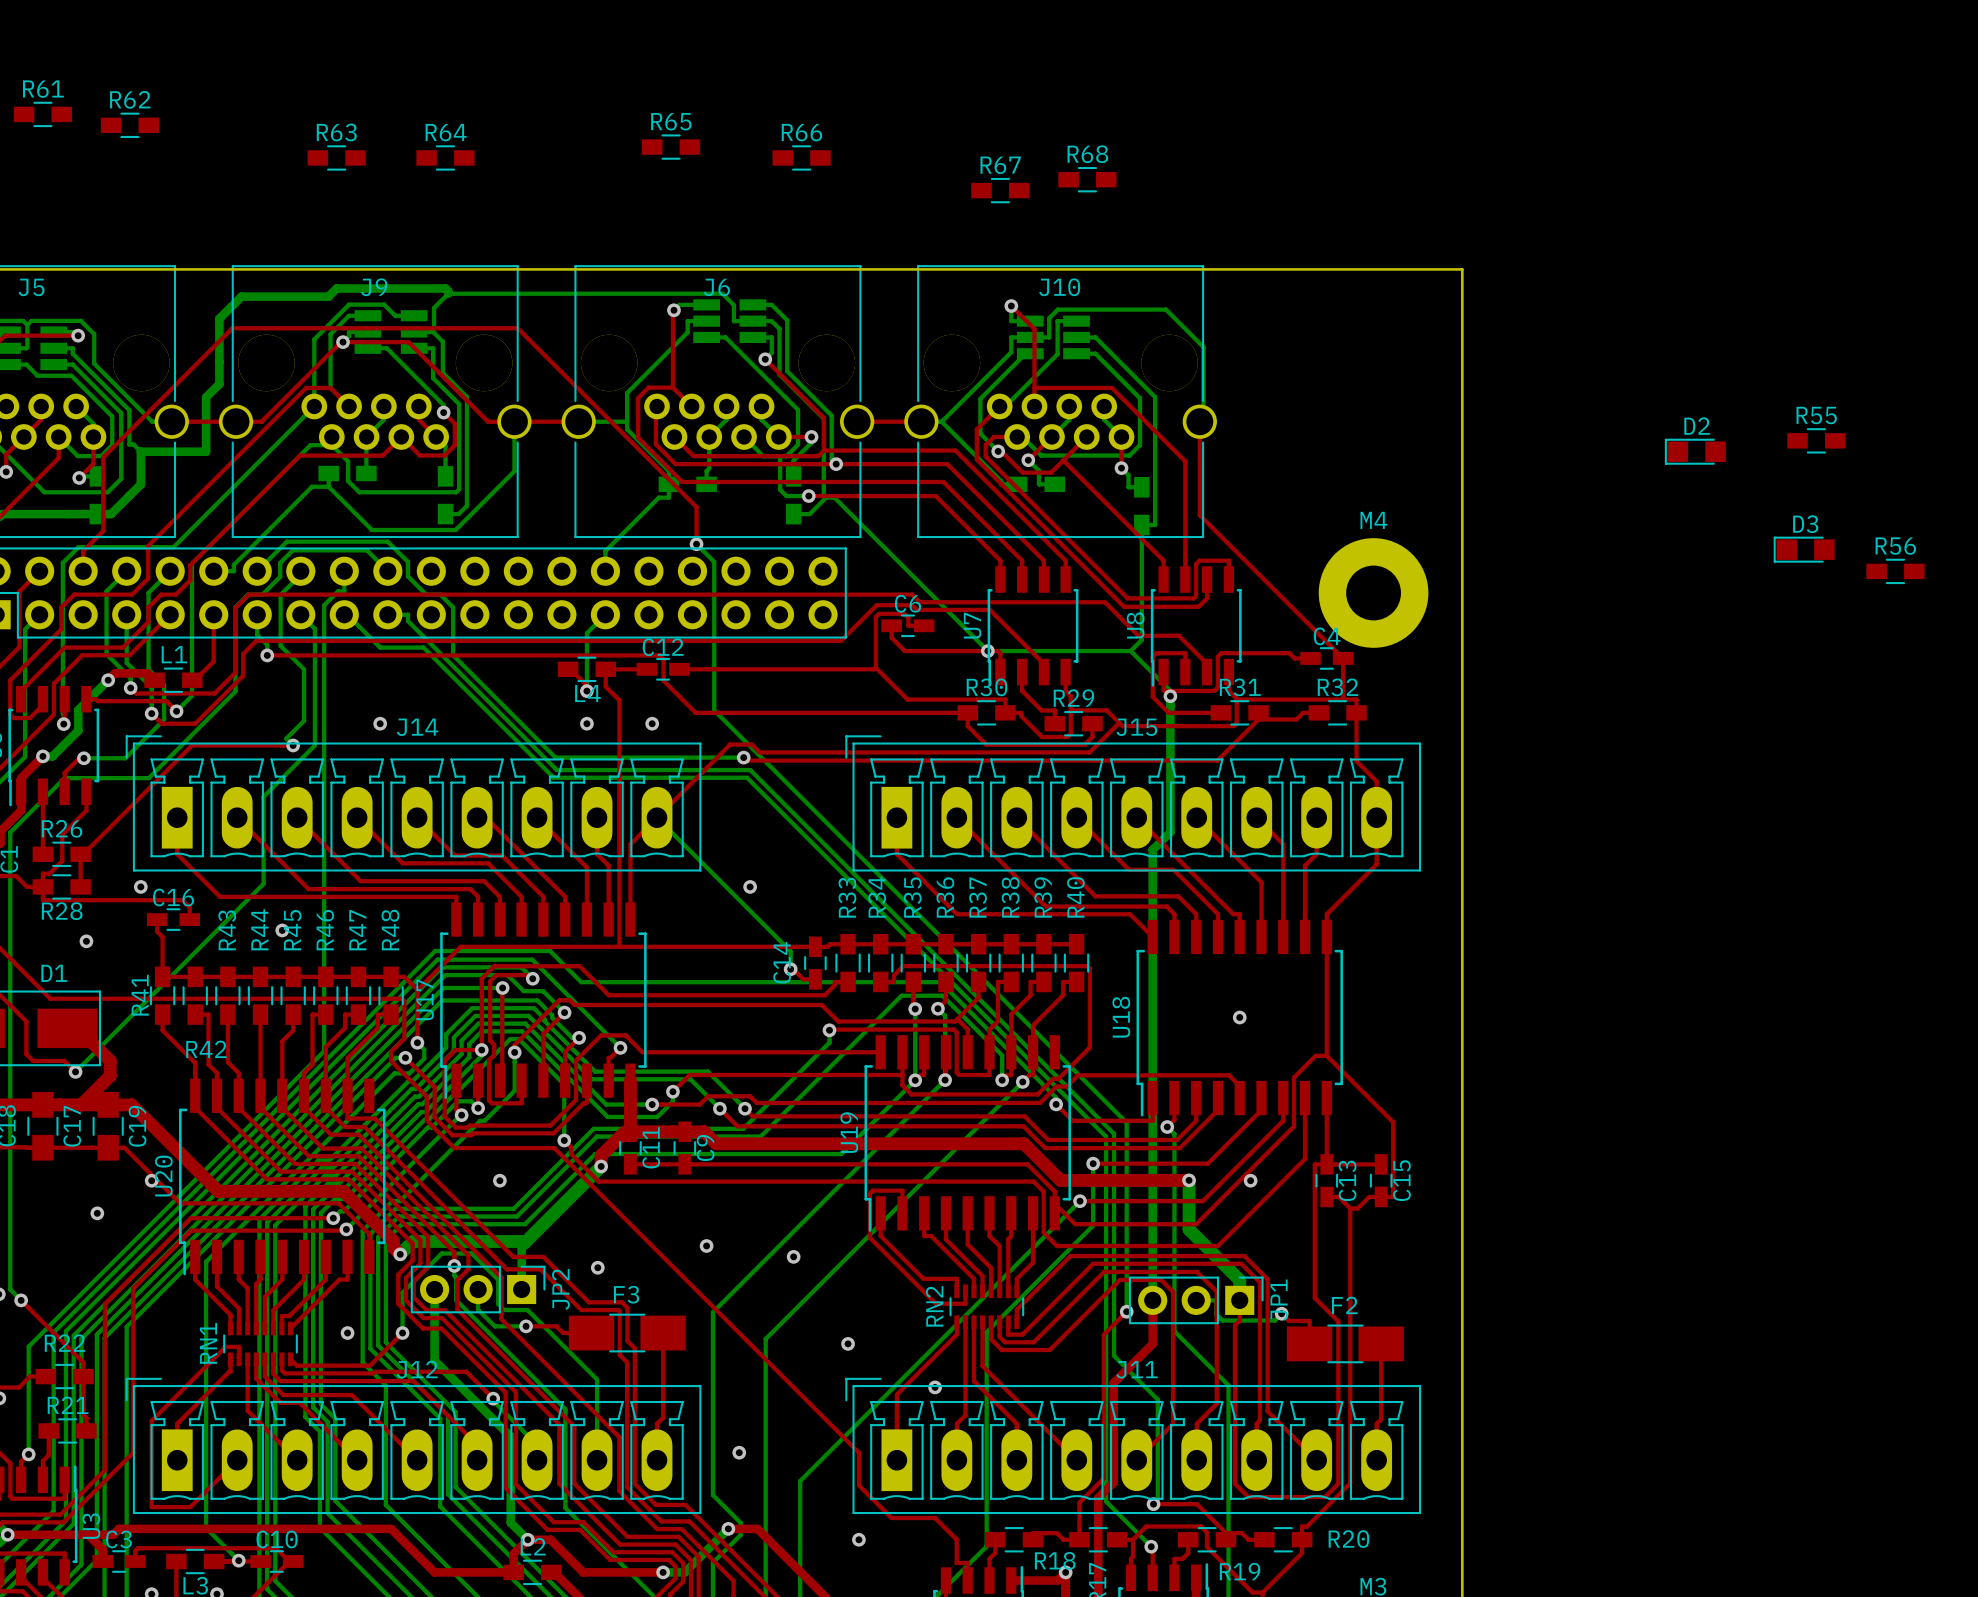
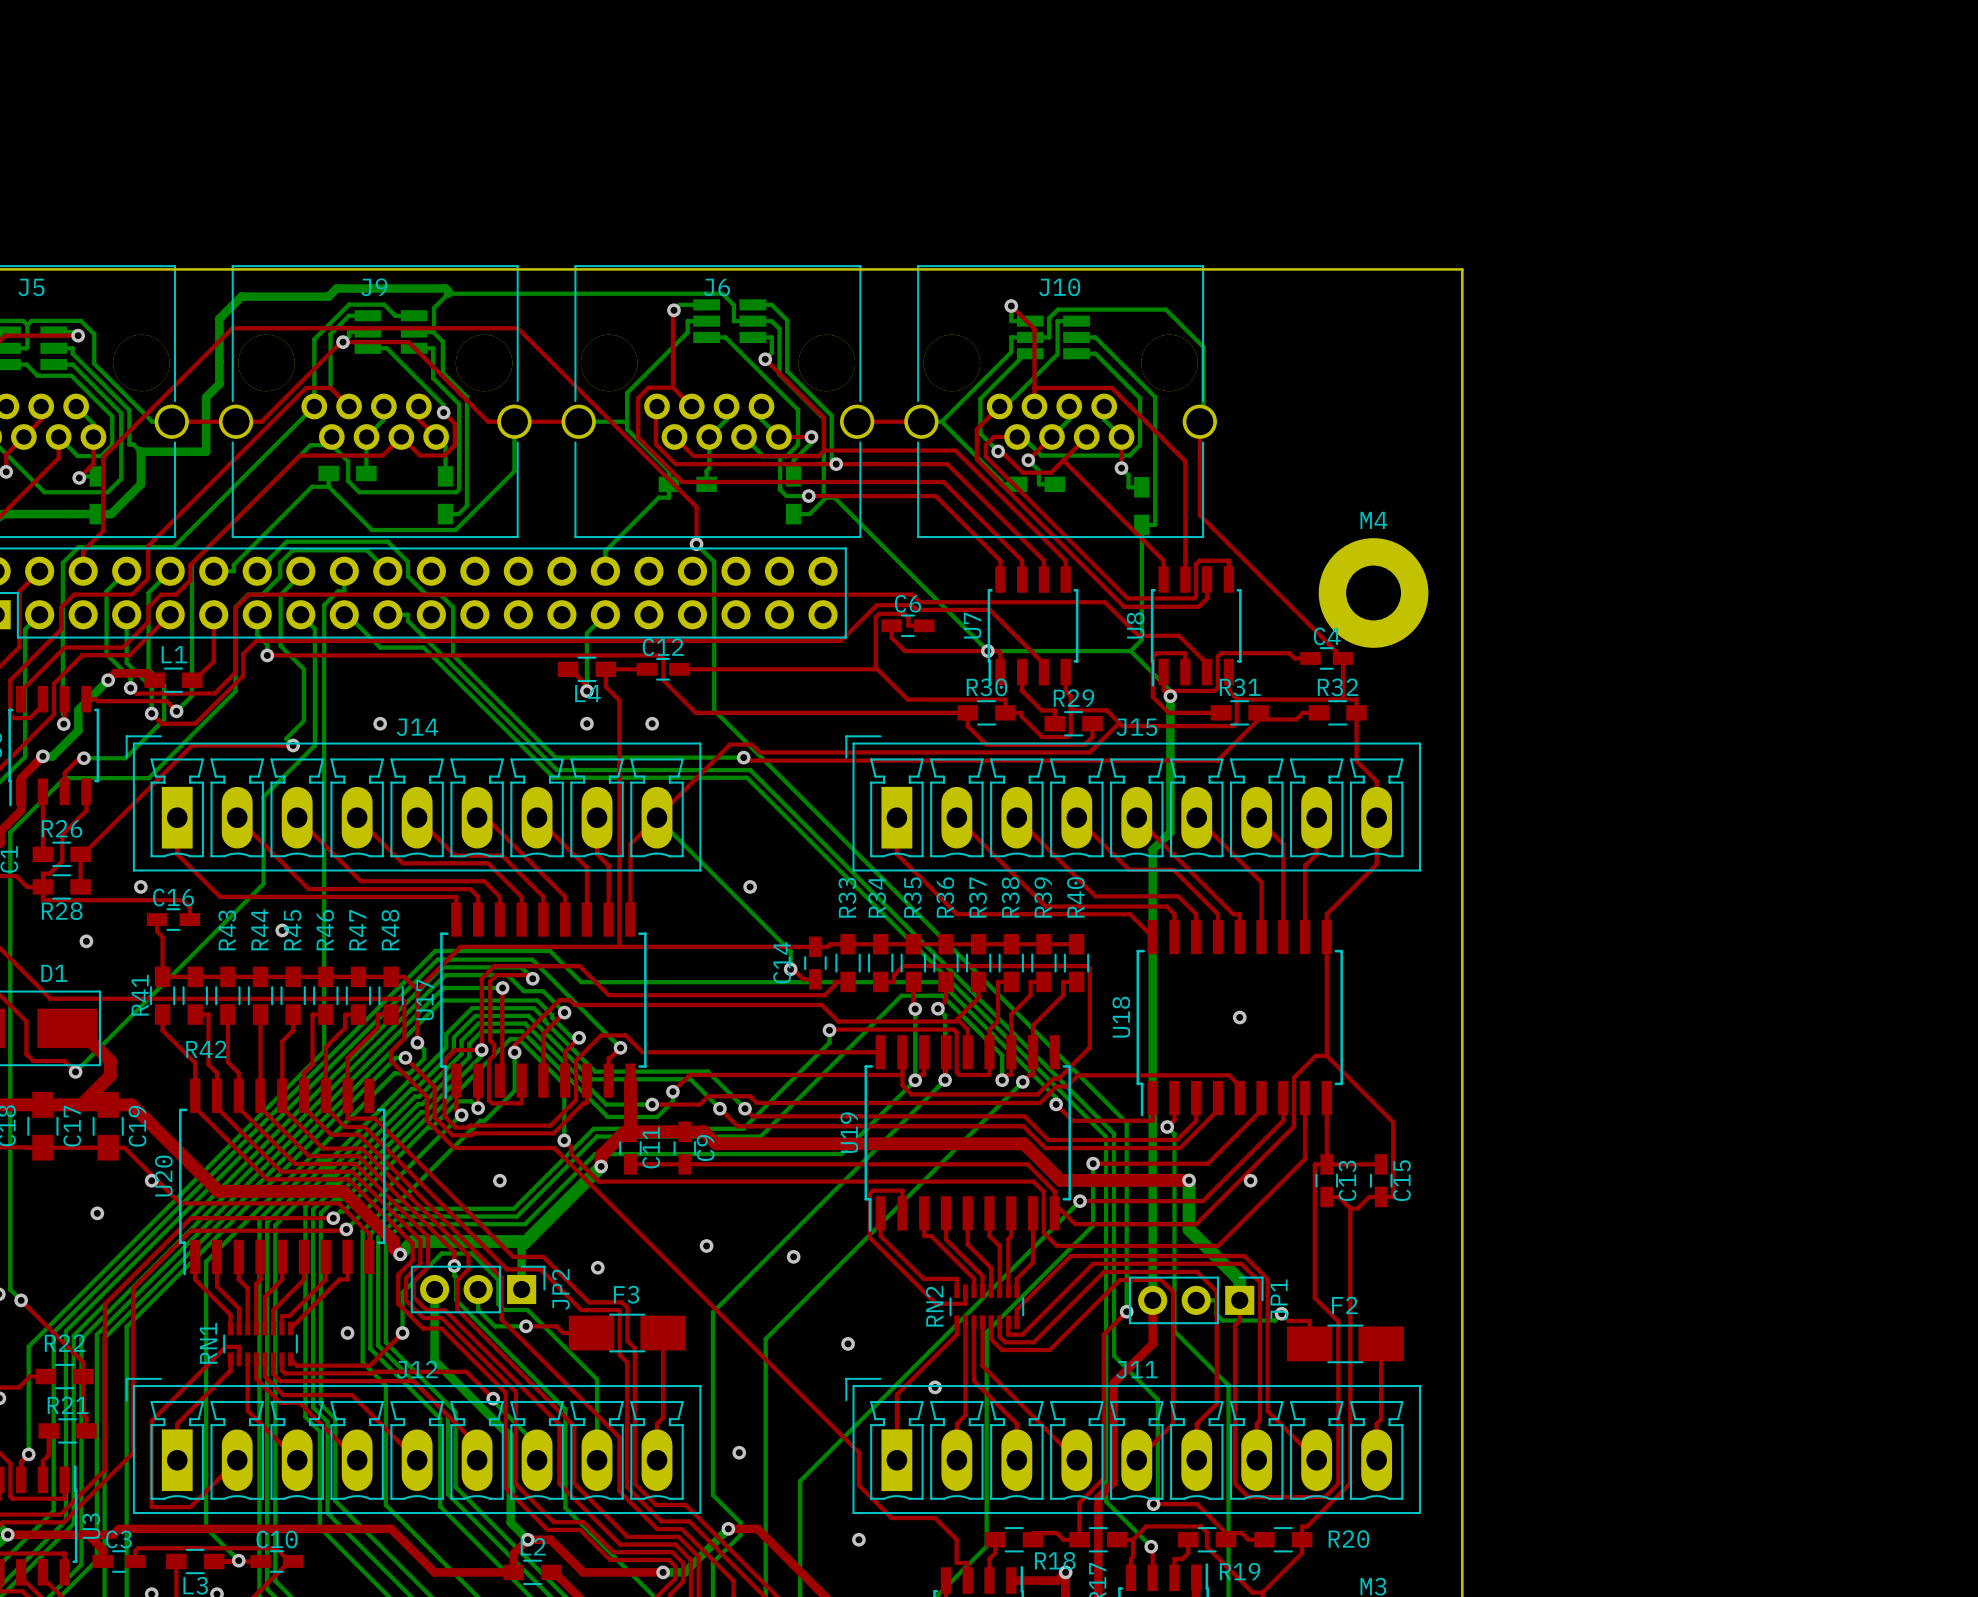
R61: (42, 114) -> none
R62: (129, 125) -> none
R65: (671, 147) -> none
R63: (336, 157) -> none
R64: (445, 157) -> none
R66: (801, 157) -> none
R68: (1087, 179) -> none
R67: (1000, 190) -> none
R55: (1816, 440) -> none
D2: (1695, 451) -> none
D3: (1804, 549) -> none
R56: (1895, 571) -> none

